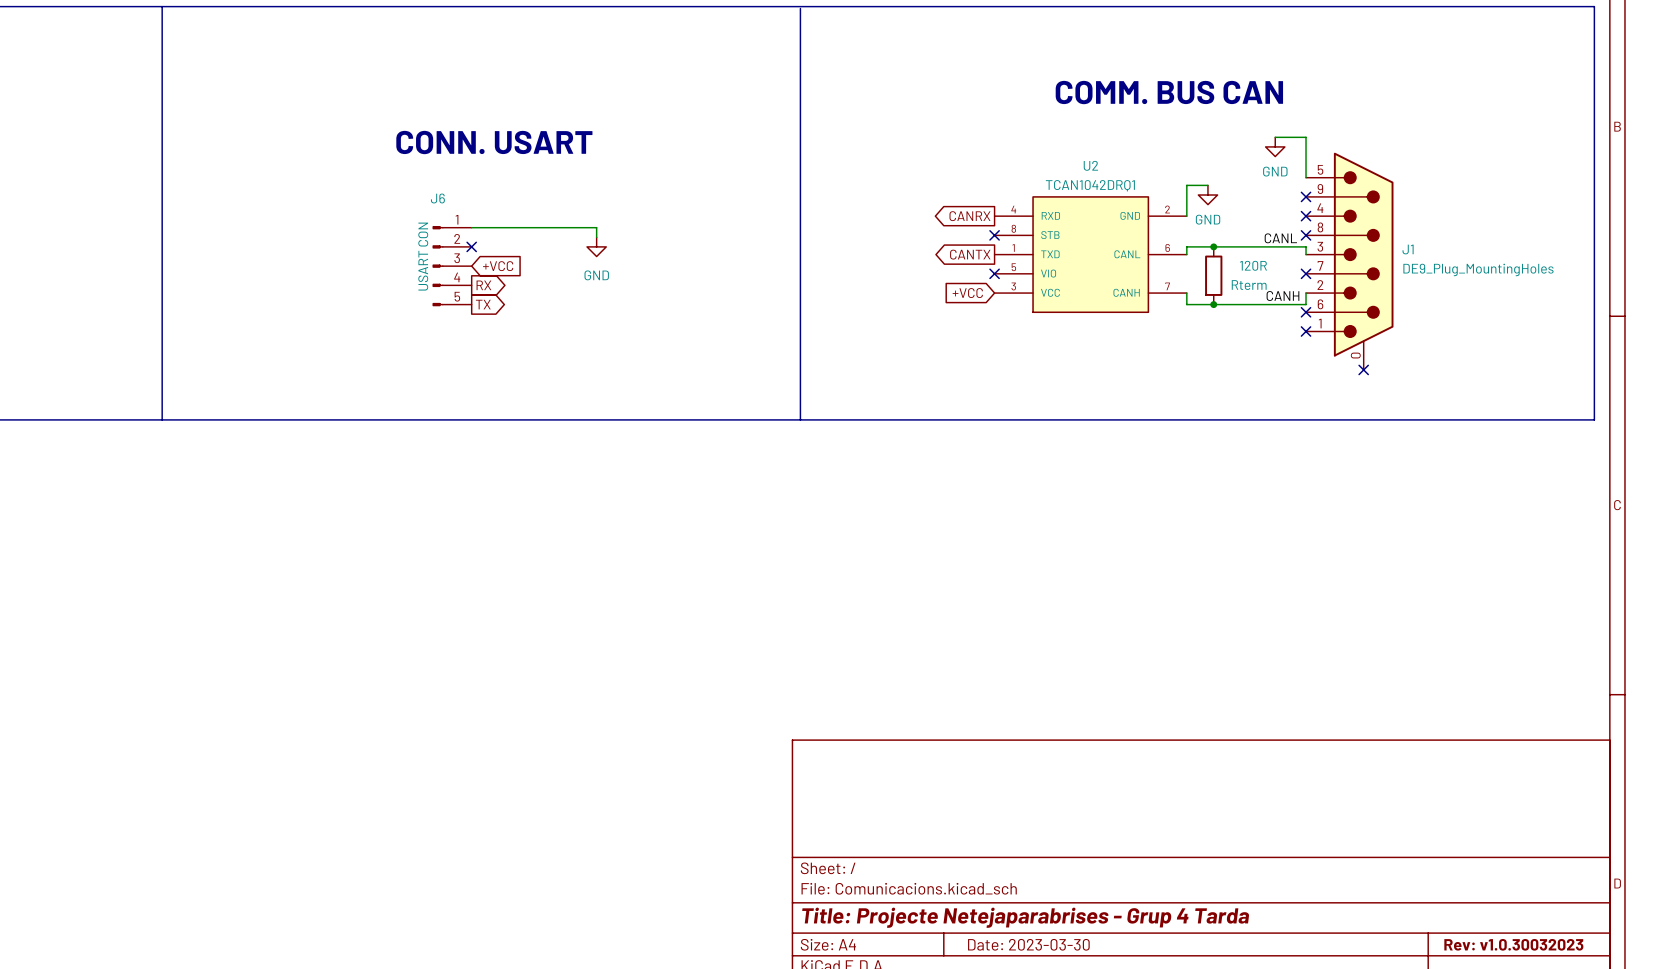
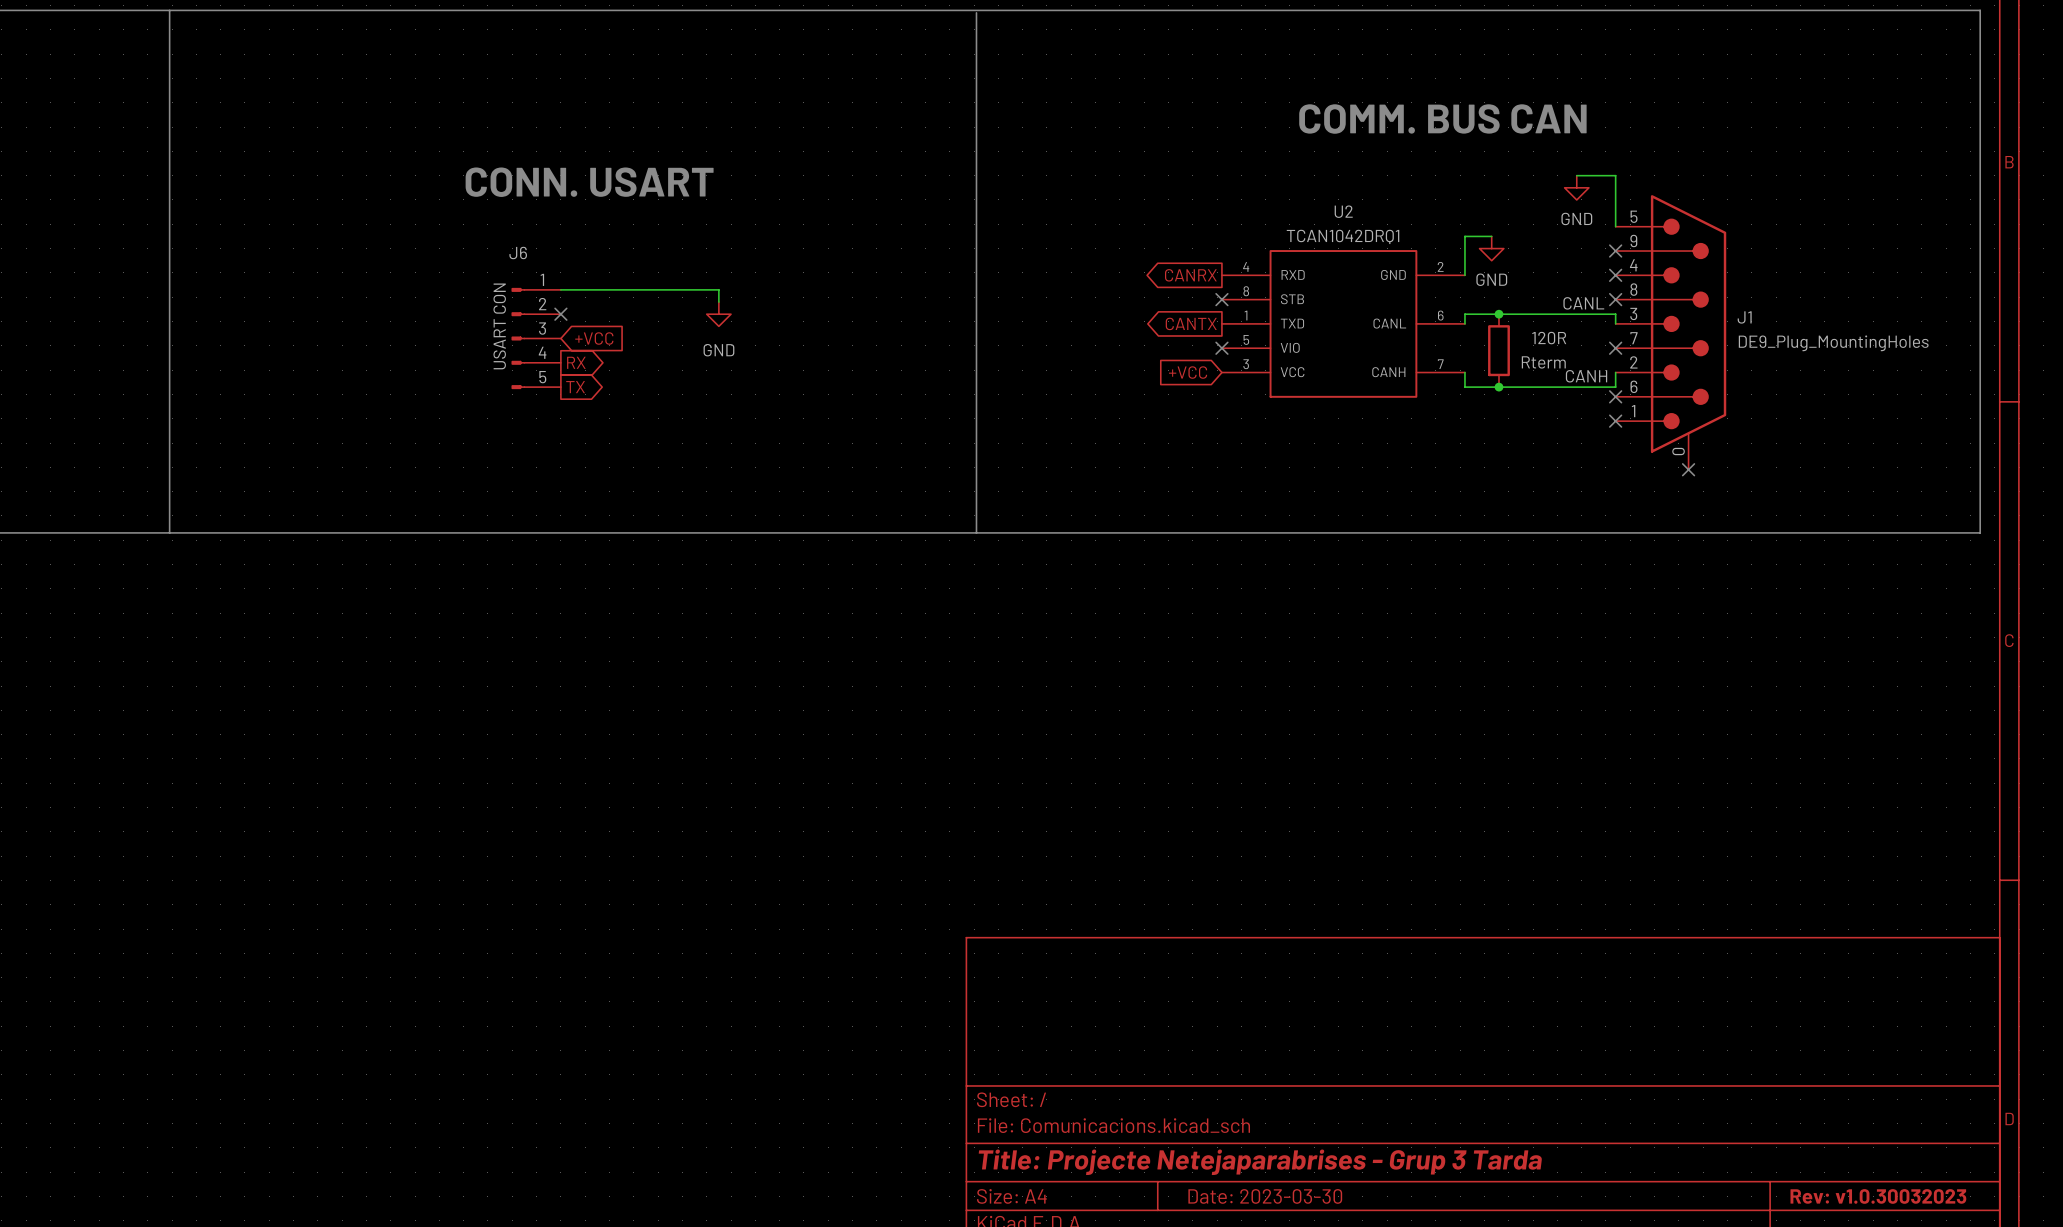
title block: Title: Projecte Netejaparabrises - Grup 4 Tarda (1025, 917) -> Title: Projecte Netejaparabrises - Grup 3 Tarda (1260, 1162)

